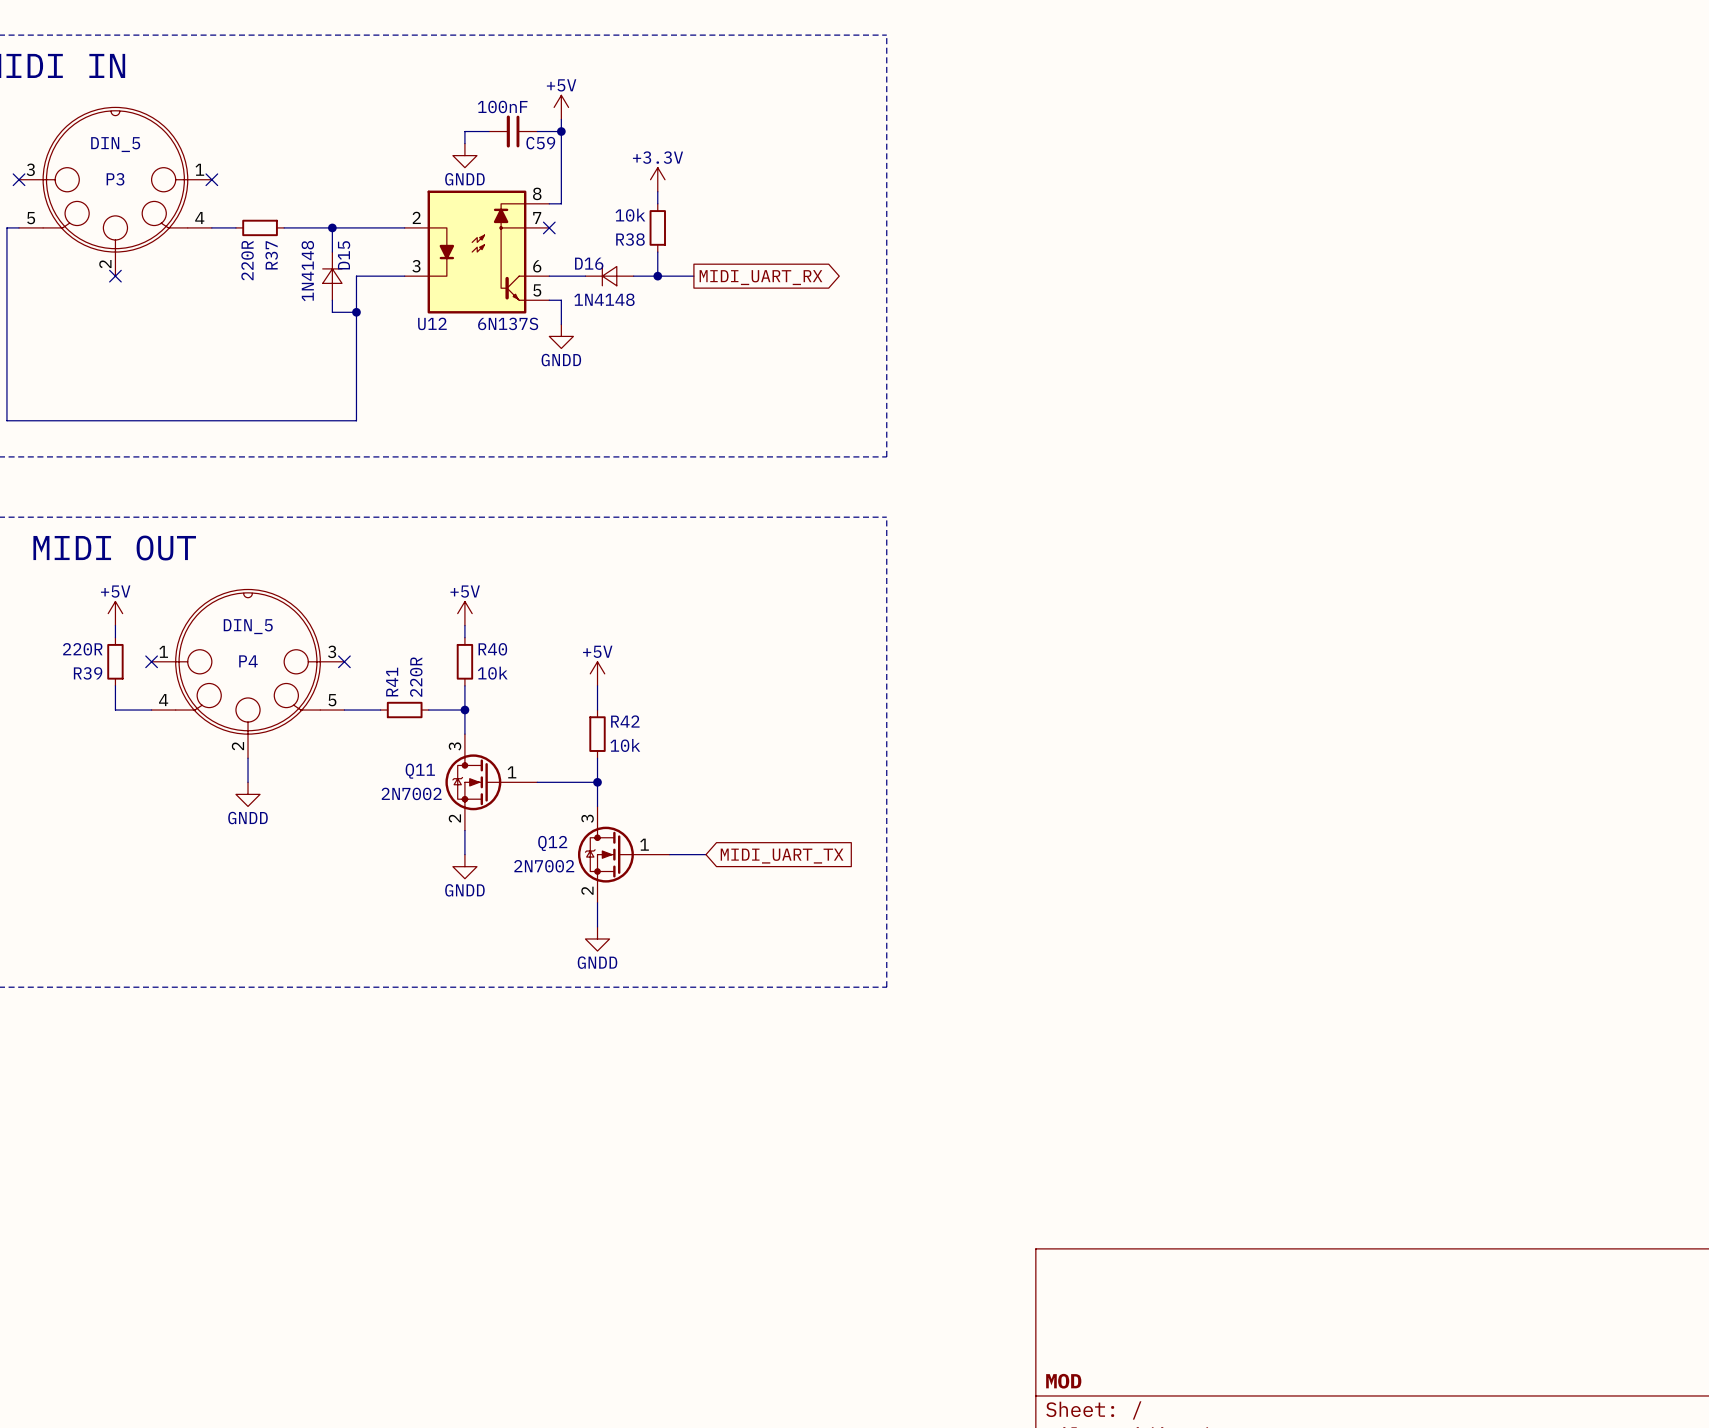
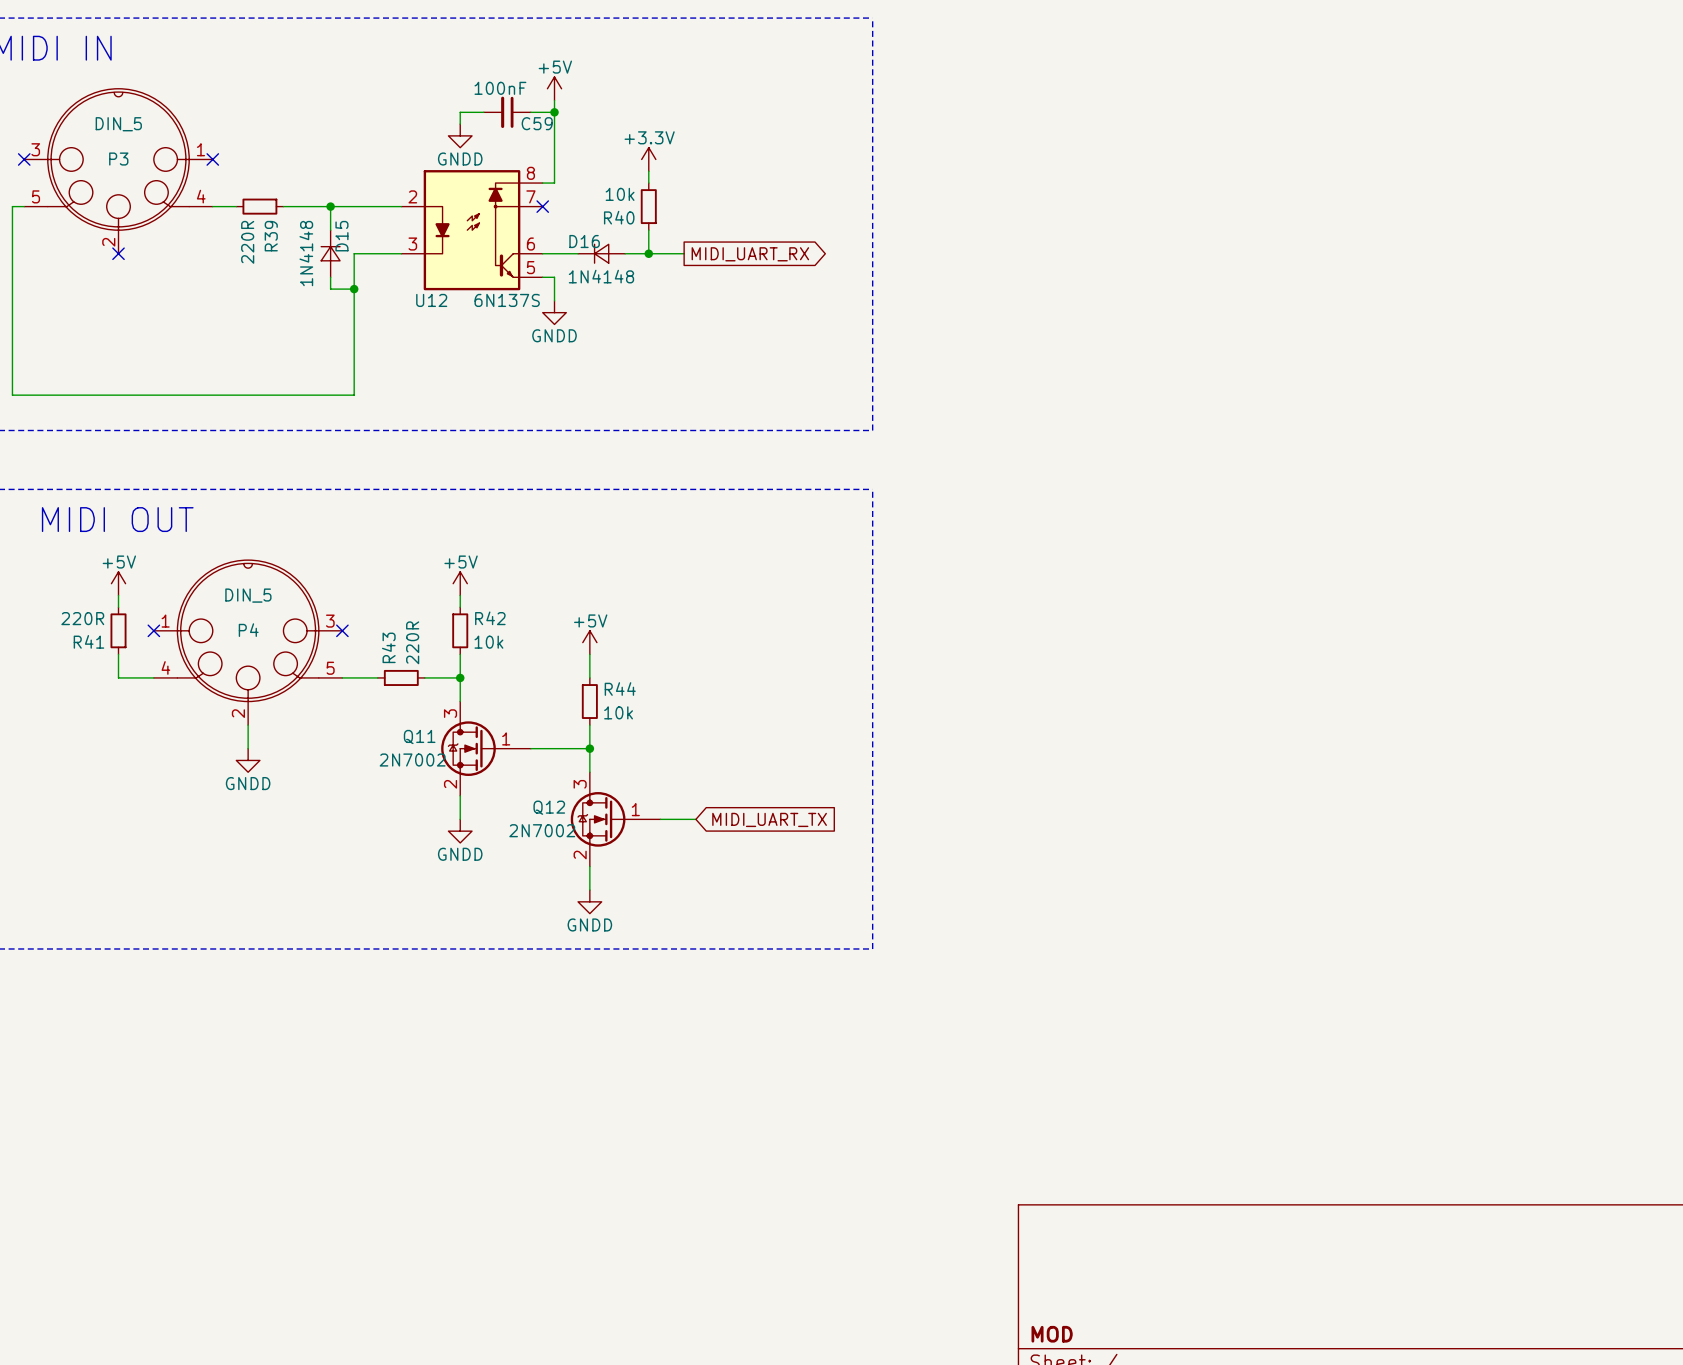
R38 name: R38 (630, 239) -> R40 (619, 217)
R37 name: R37 (271, 255) -> R39 (271, 236)
R40 name: R40 (492, 649) -> R42 (490, 618)
R39 name: R39 (88, 673) -> R41 (88, 641)
R41 name: R41 (392, 682) -> R43 (388, 647)
R42 name: R42 (625, 721) -> R44 (620, 689)

